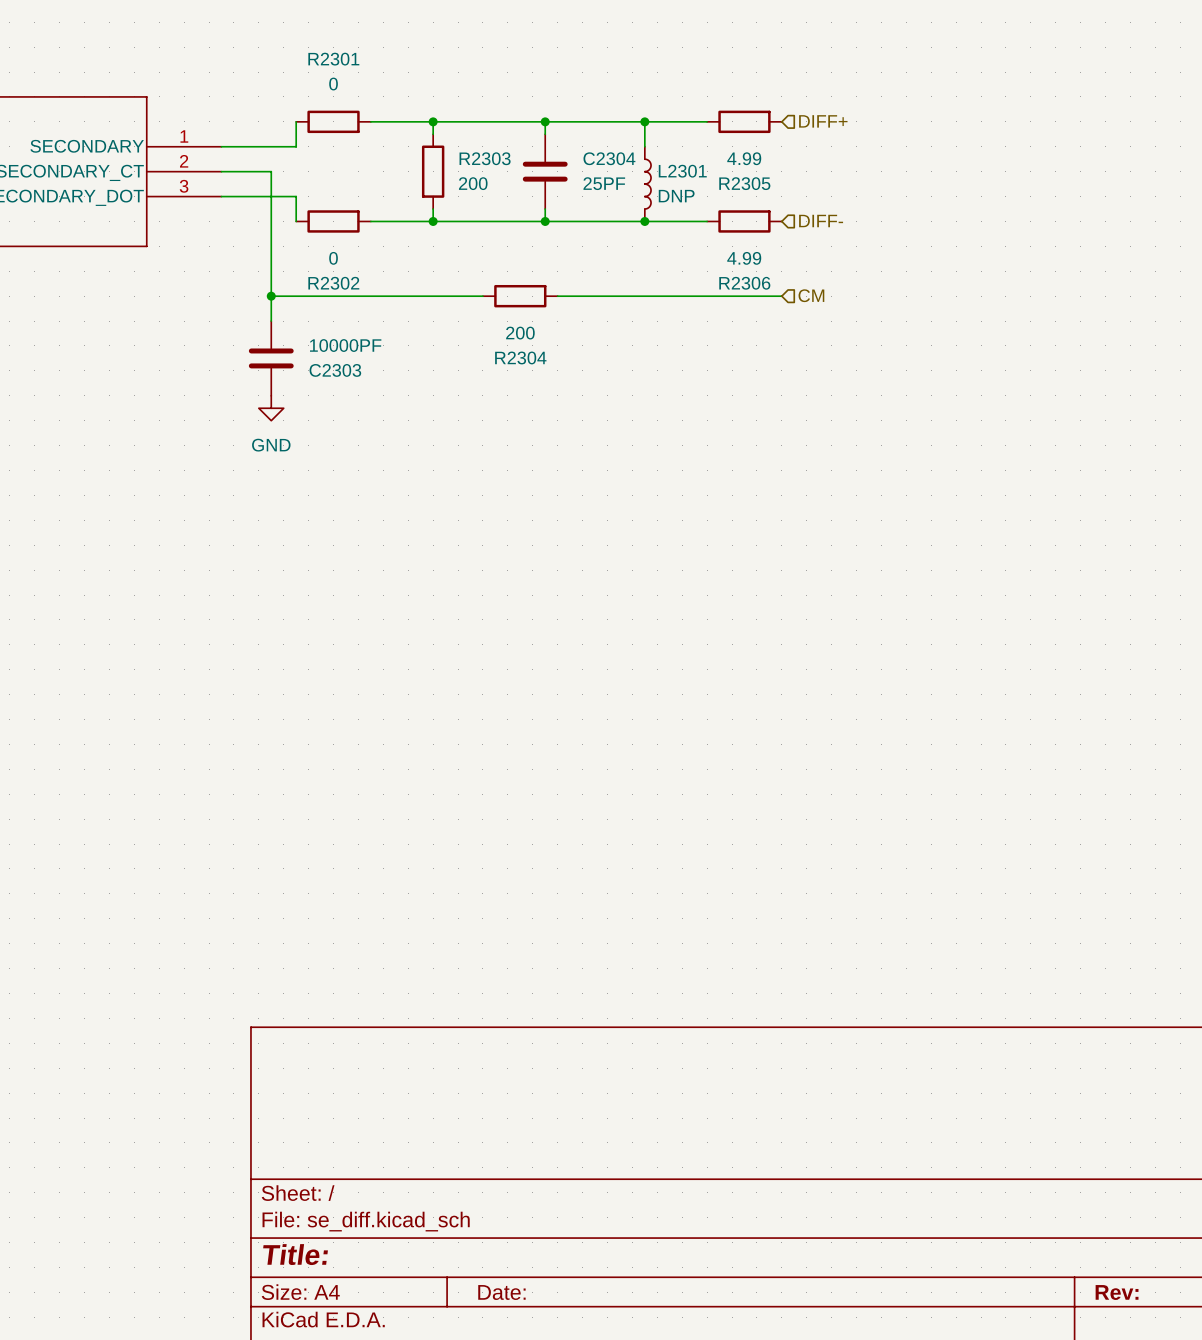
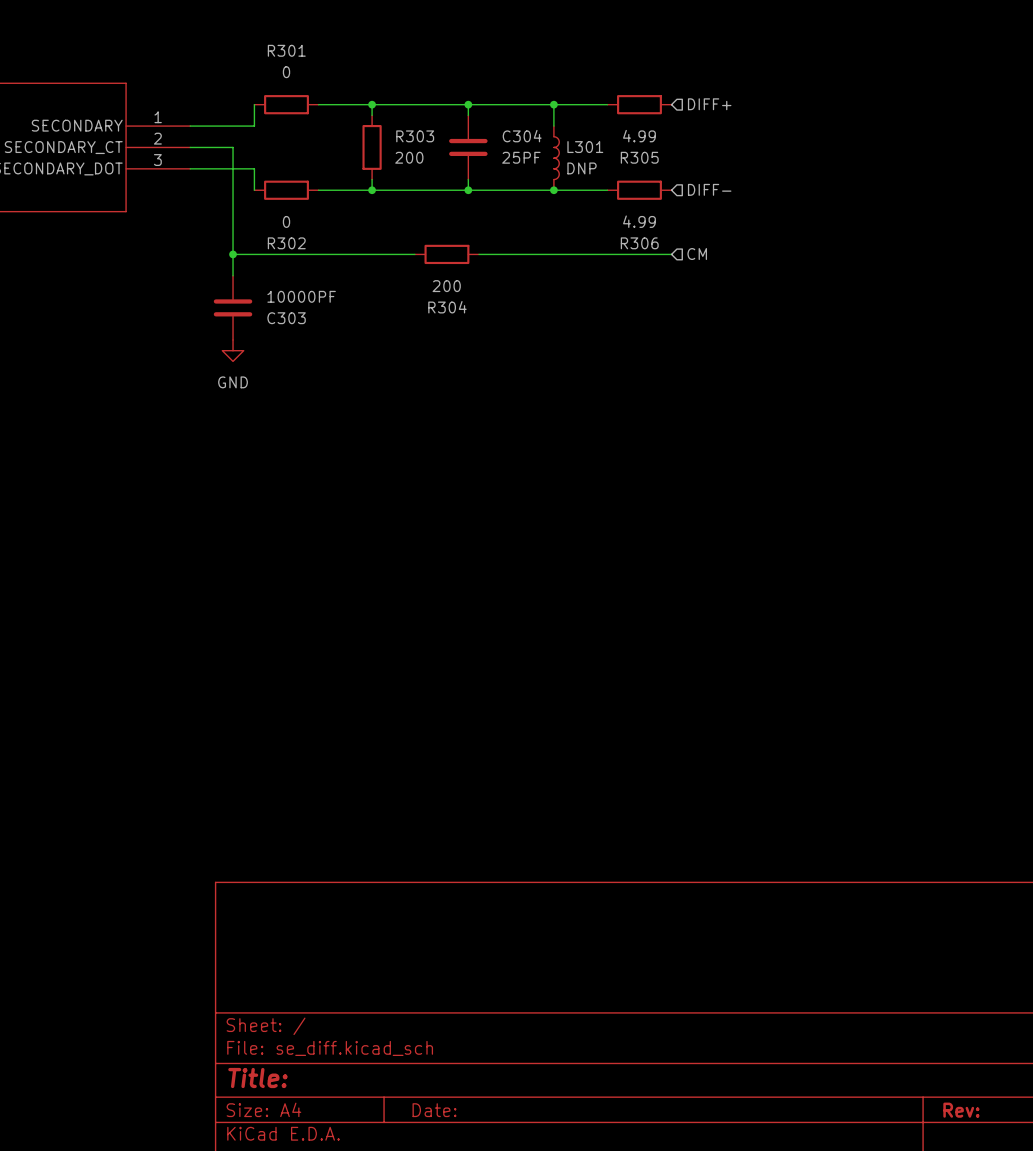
R2301 name: R2301 (333, 59) -> R301 (286, 50)
R2303 name: R2303 (485, 158) -> R303 (415, 136)
C2304 name: C2304 (609, 158) -> C304 (522, 136)
L2301 name: L2301 (682, 171) -> L301 (585, 147)
R2305 name: R2305 (744, 183) -> R305 (639, 157)
R2302 name: R2302 (333, 283) -> R302 (286, 243)
R2306 name: R2306 (744, 283) -> R306 (639, 243)
R2304 name: R2304 (520, 357) -> R304 (447, 307)
C2303 name: C2303 (335, 370) -> C303 (286, 318)

